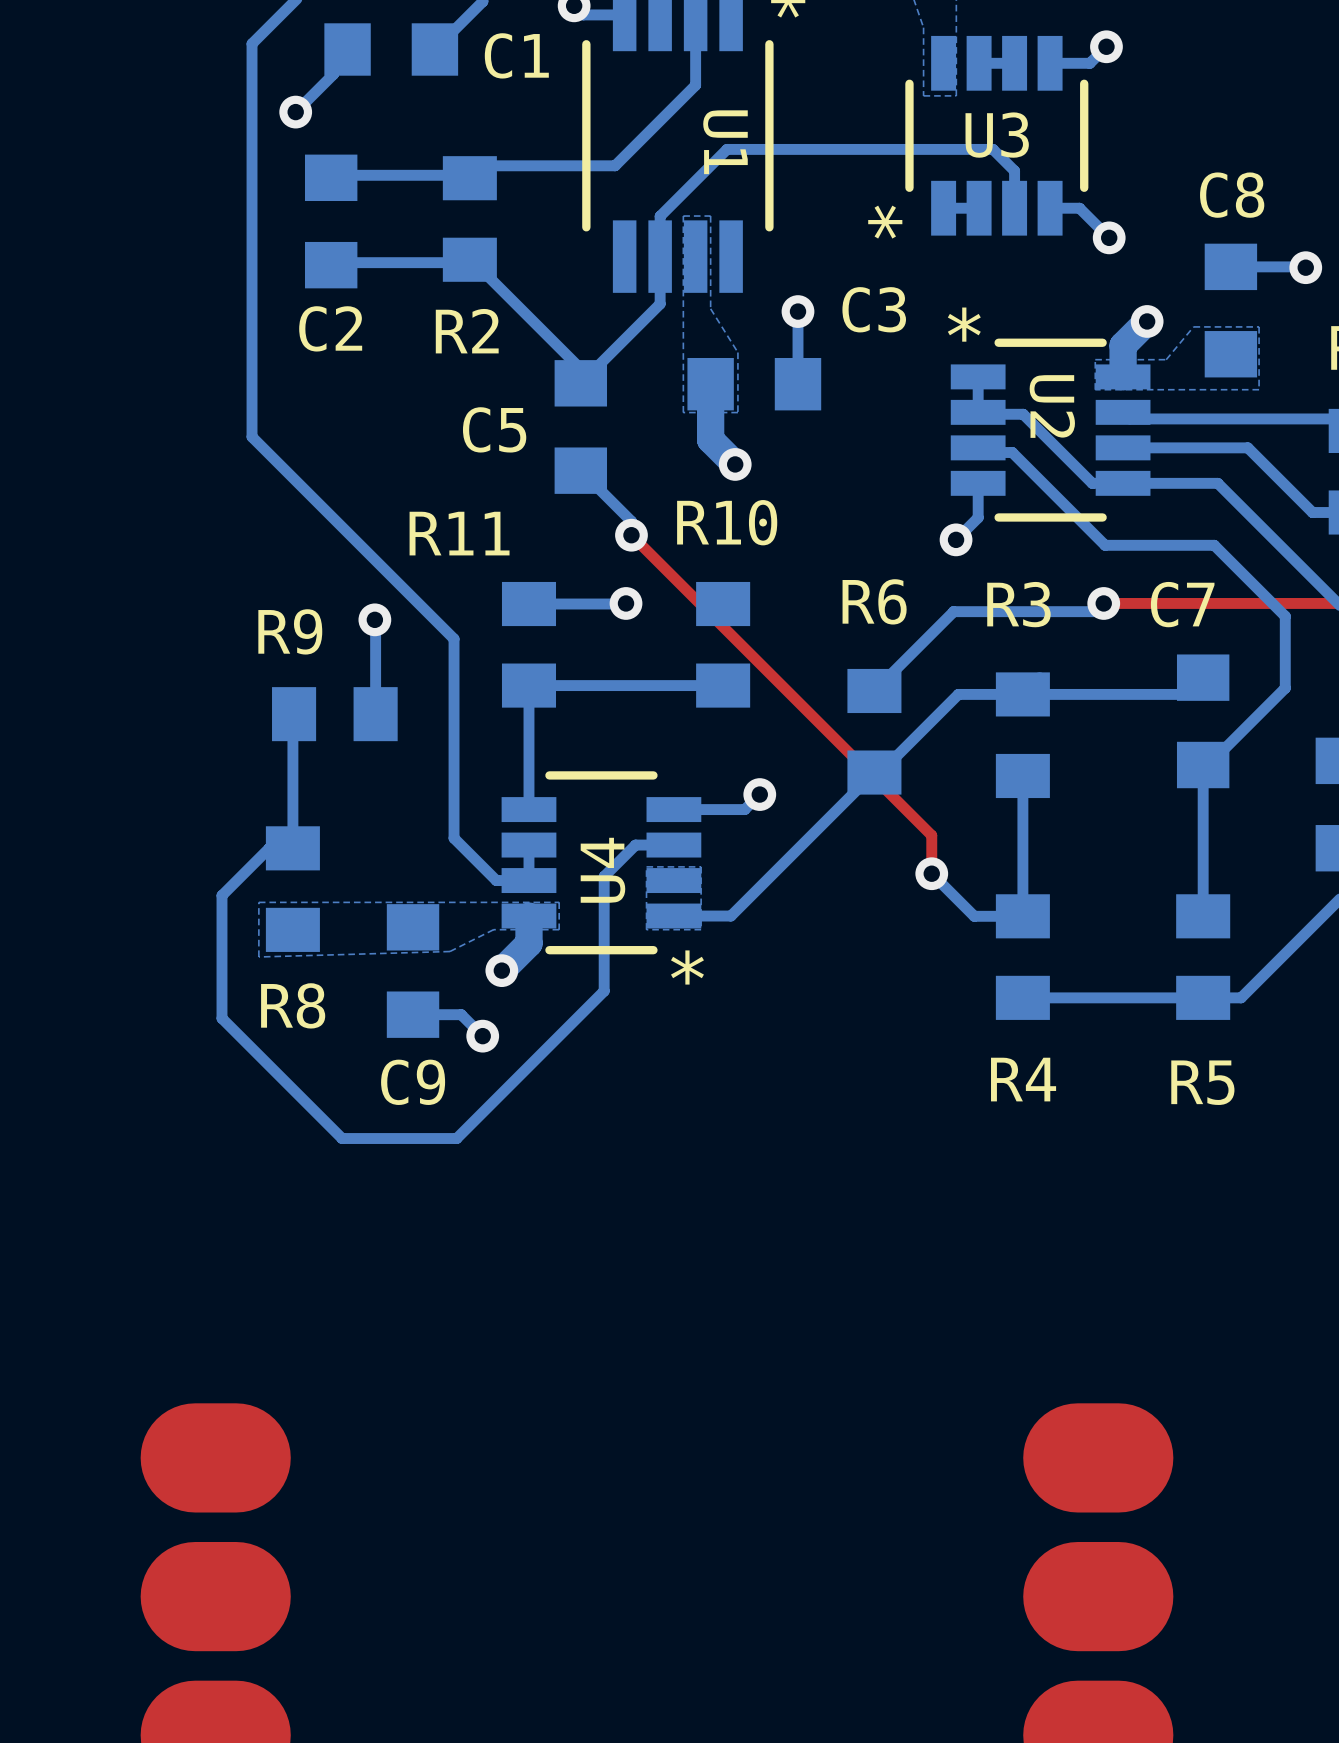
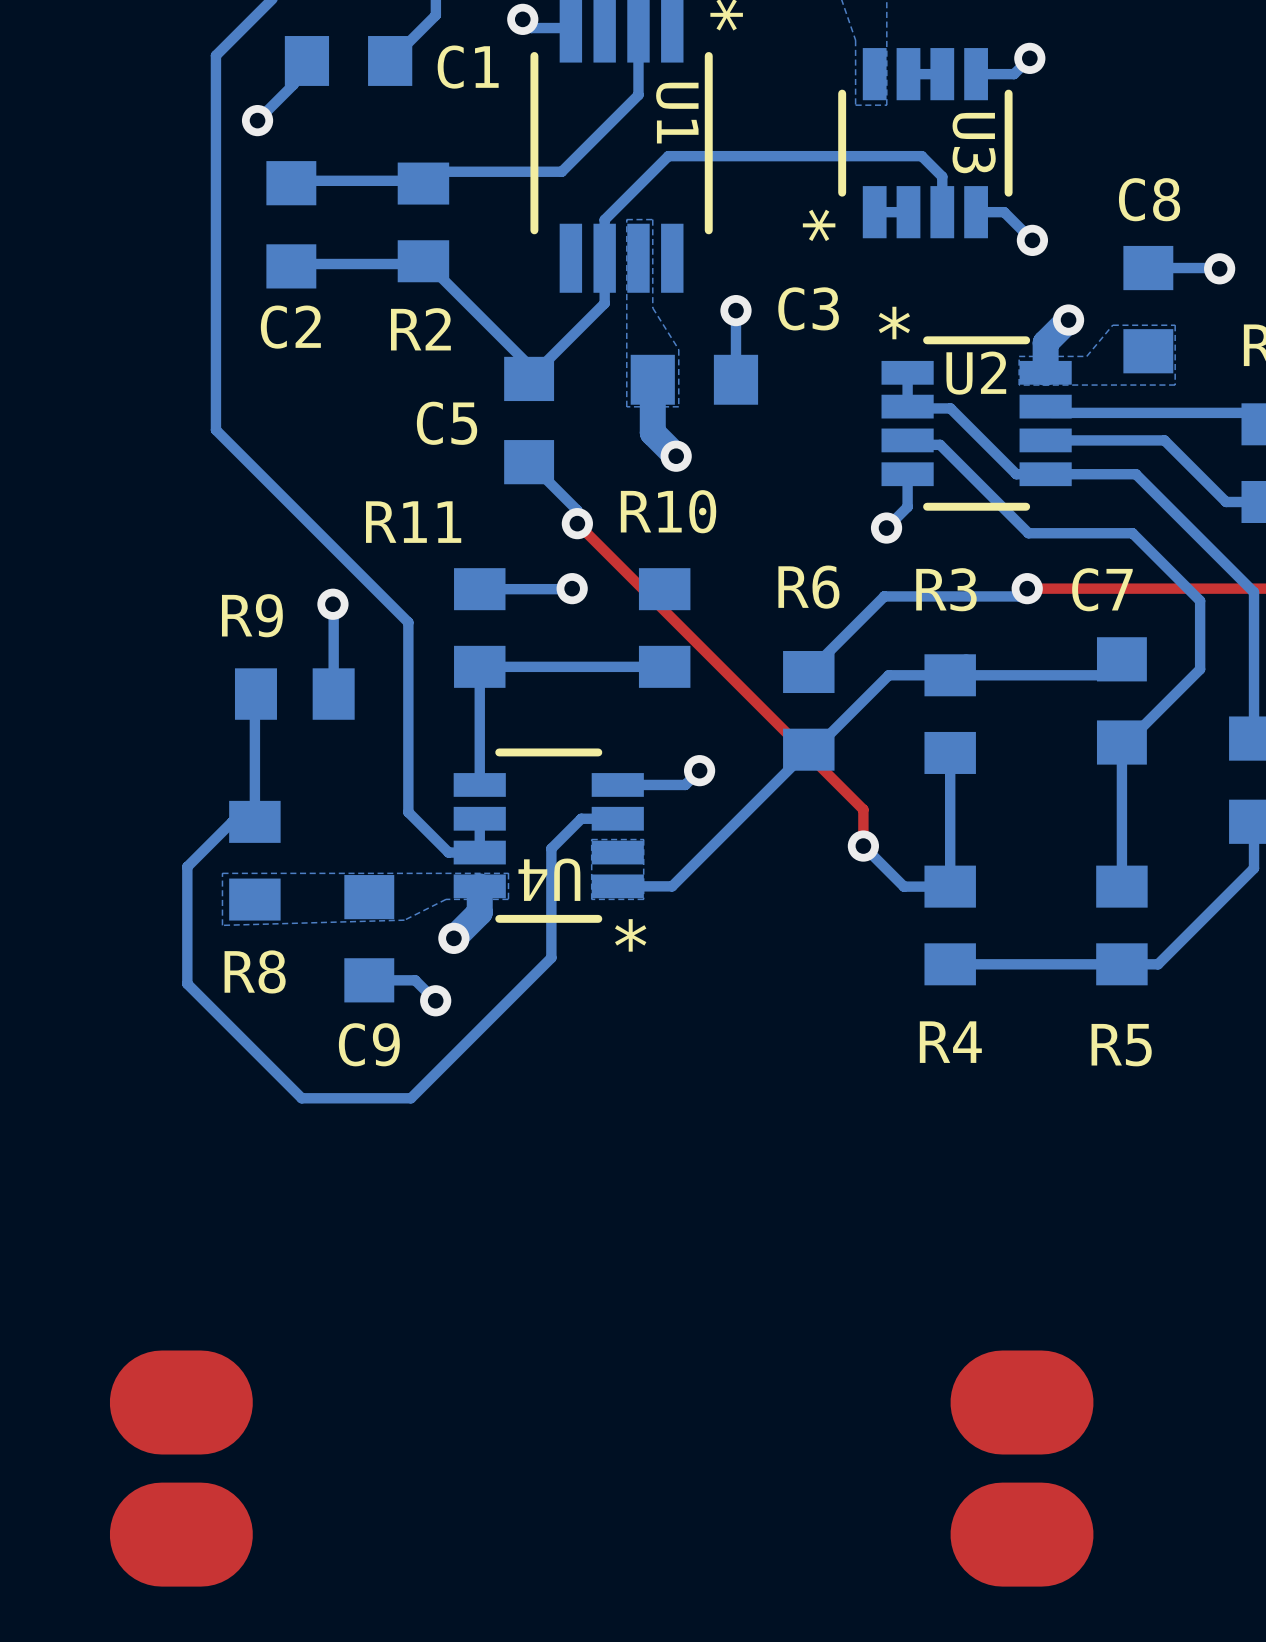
U3 name rotation: 0° (997, 135) -> 90° clockwise (974, 143)
U1 name position: U1 (725, 142) -> U1 (677, 113)
U2 name rotation: 0° (1052, 406) -> 90° counterclockwise (976, 373)
U4 name rotation: 0° (602, 870) -> 90° counterclockwise (549, 879)

